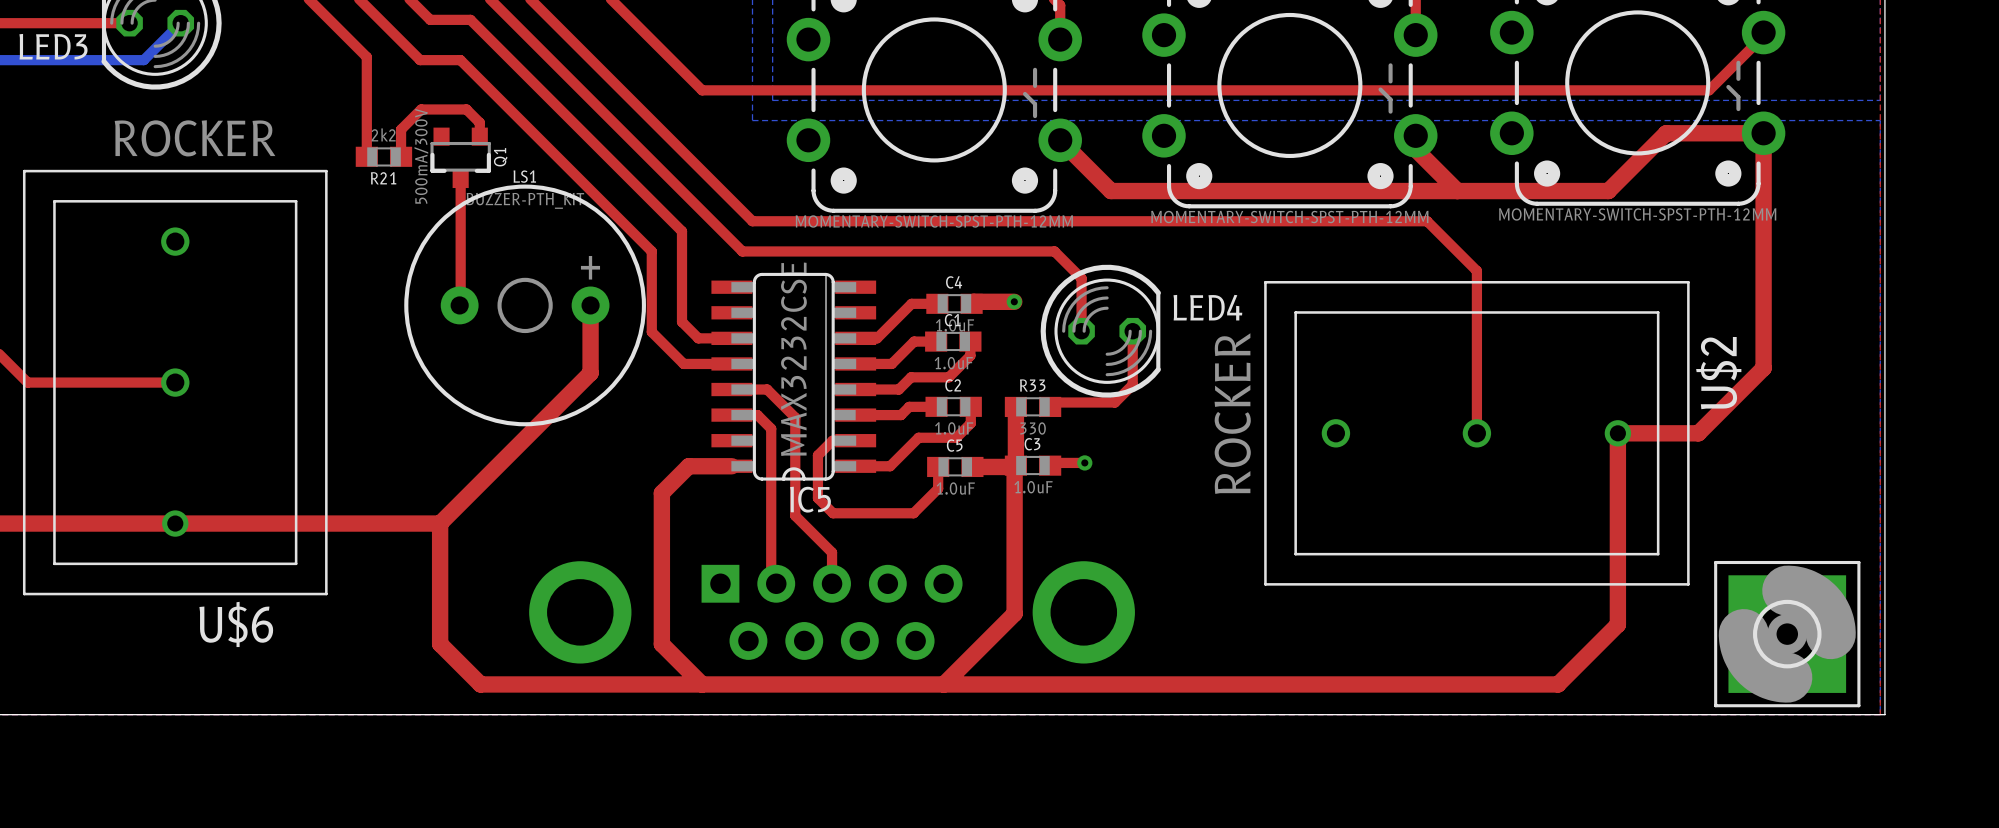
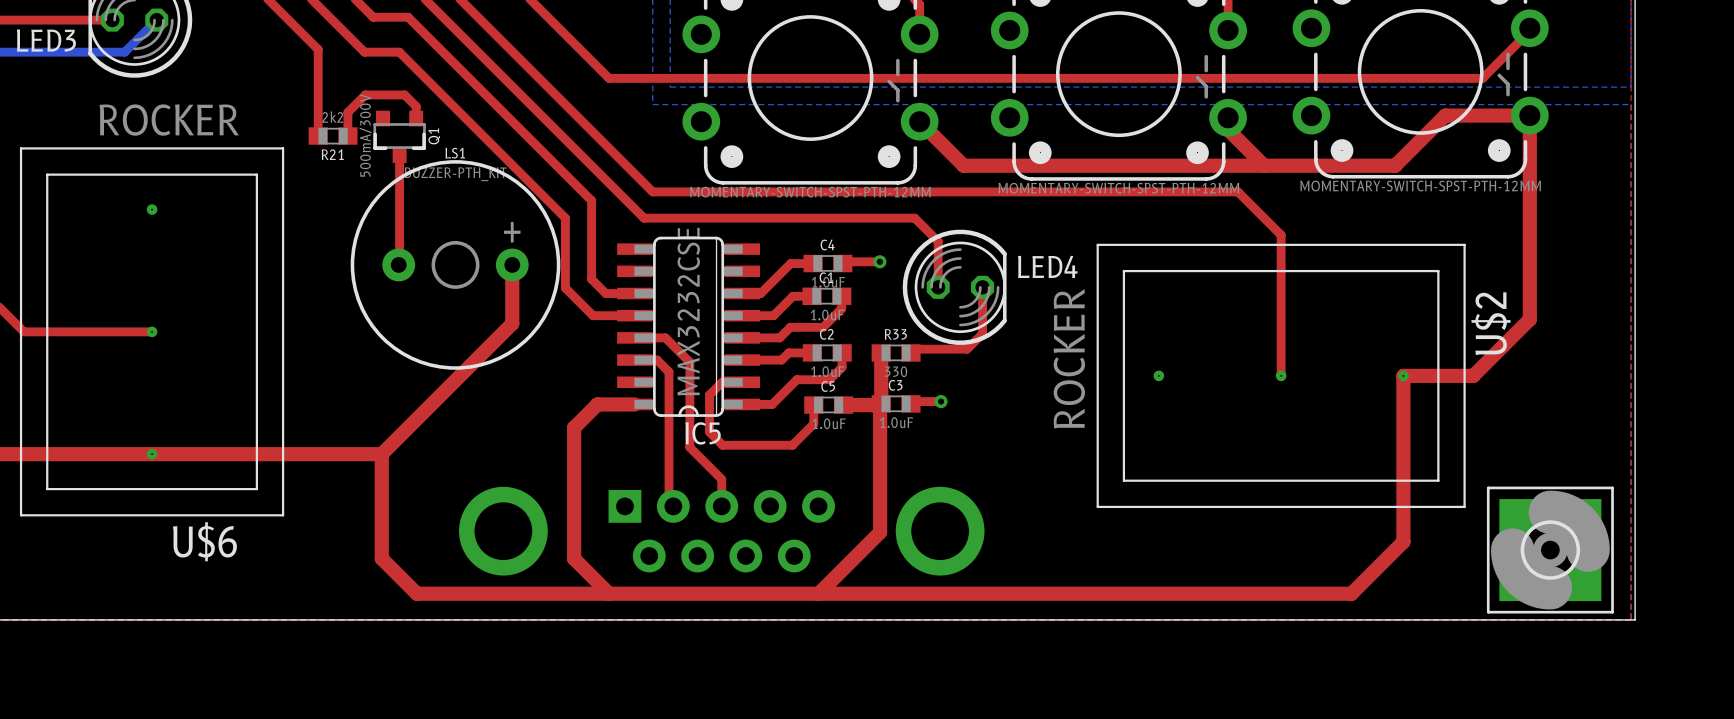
U$6 footprint: [22, 169, 328, 596] -> [19, 147, 285, 517]
U$2 footprint: [1264, 281, 1690, 586] -> [1096, 243, 1466, 509]
top track width: thick (973, 301) (1014, 301) -> thin (844, 261) (879, 261)

